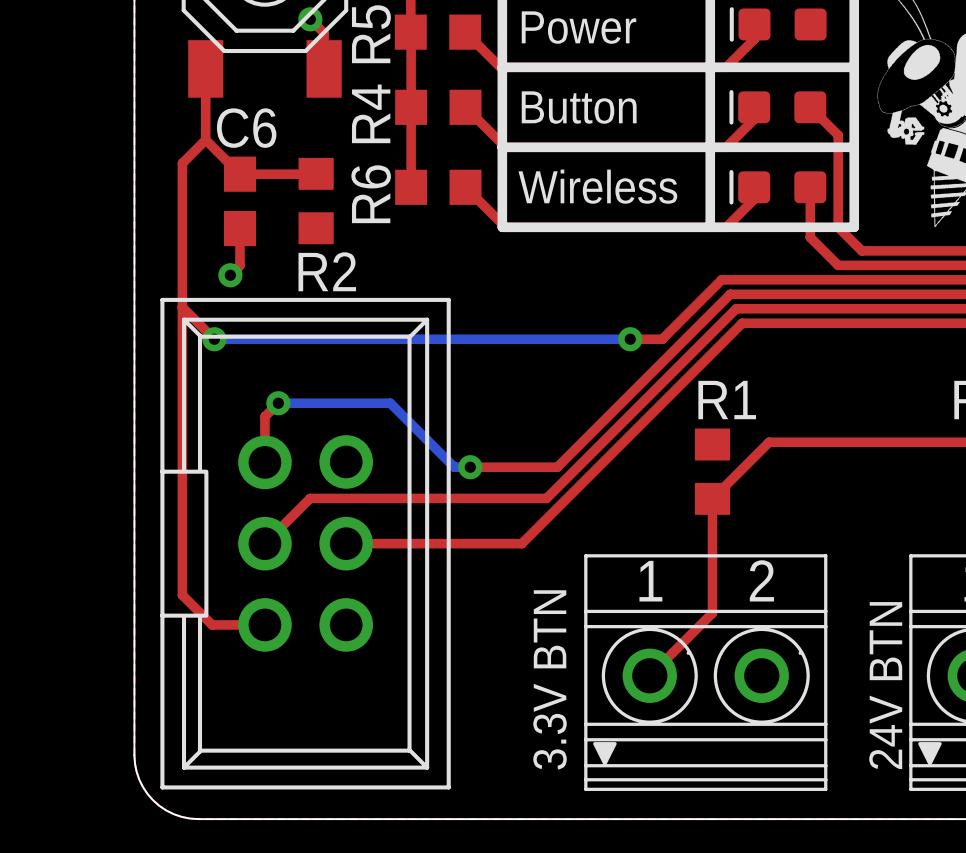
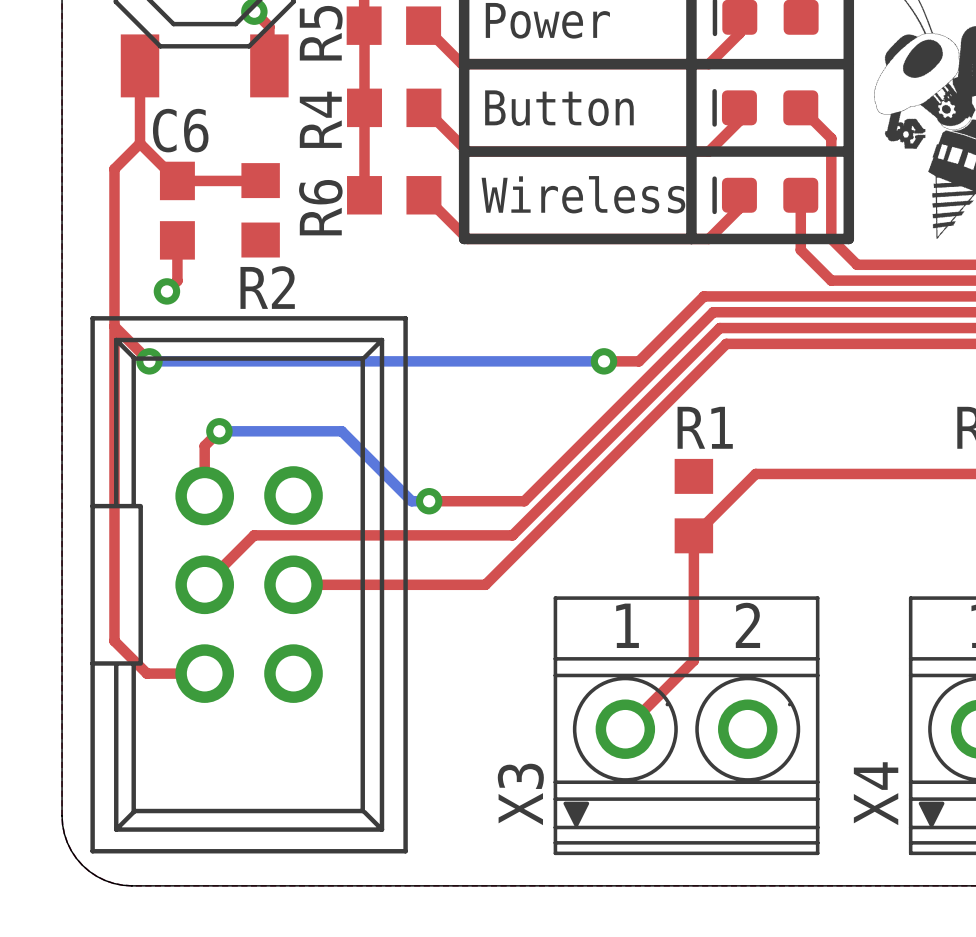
text: 3.3V BTN (550, 679) -> none
text: 24V BTN (885, 685) -> none
X4 name: none -> X4 (876, 793)
X3 name: none -> X3 (520, 794)

